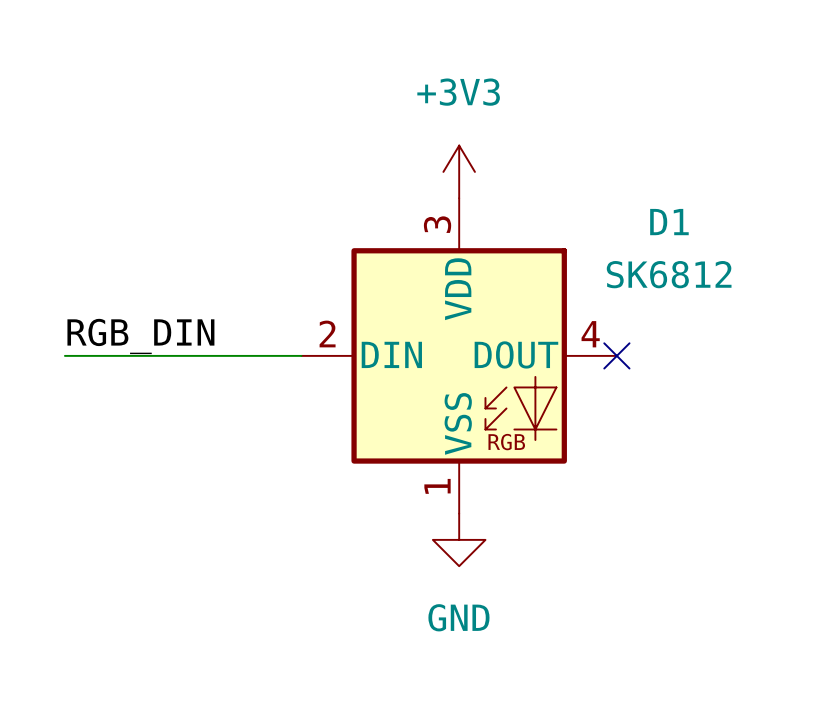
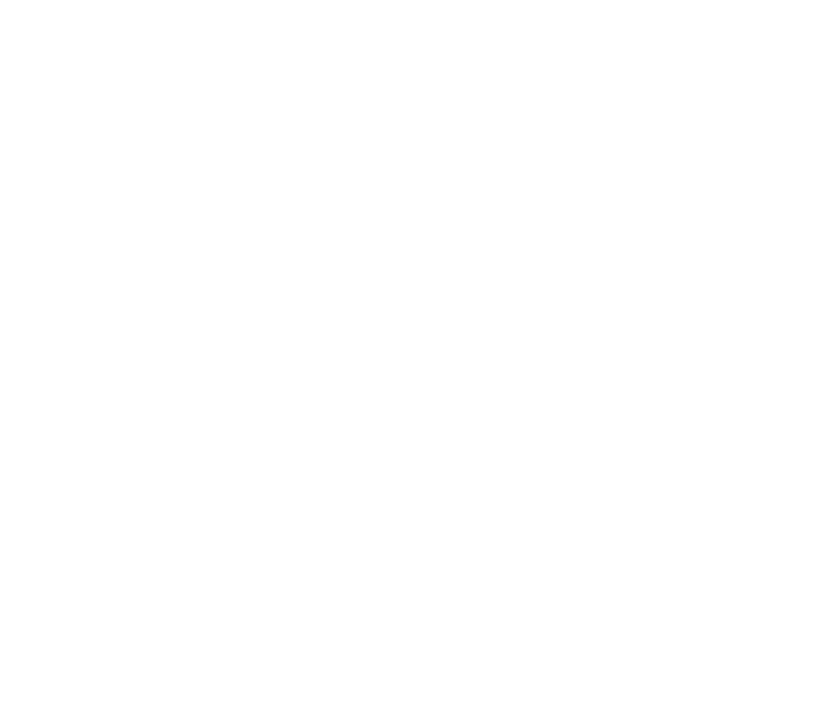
power symbol: +3V3 (459, 171) -> none
label: RGB_DIN (140, 336) -> none
wire: (64, 355) (301, 355) -> none
D1: SK6812 (459, 355) -> none
no-connect mark: (616, 355) -> none
power symbol: GND (459, 539) -> none

